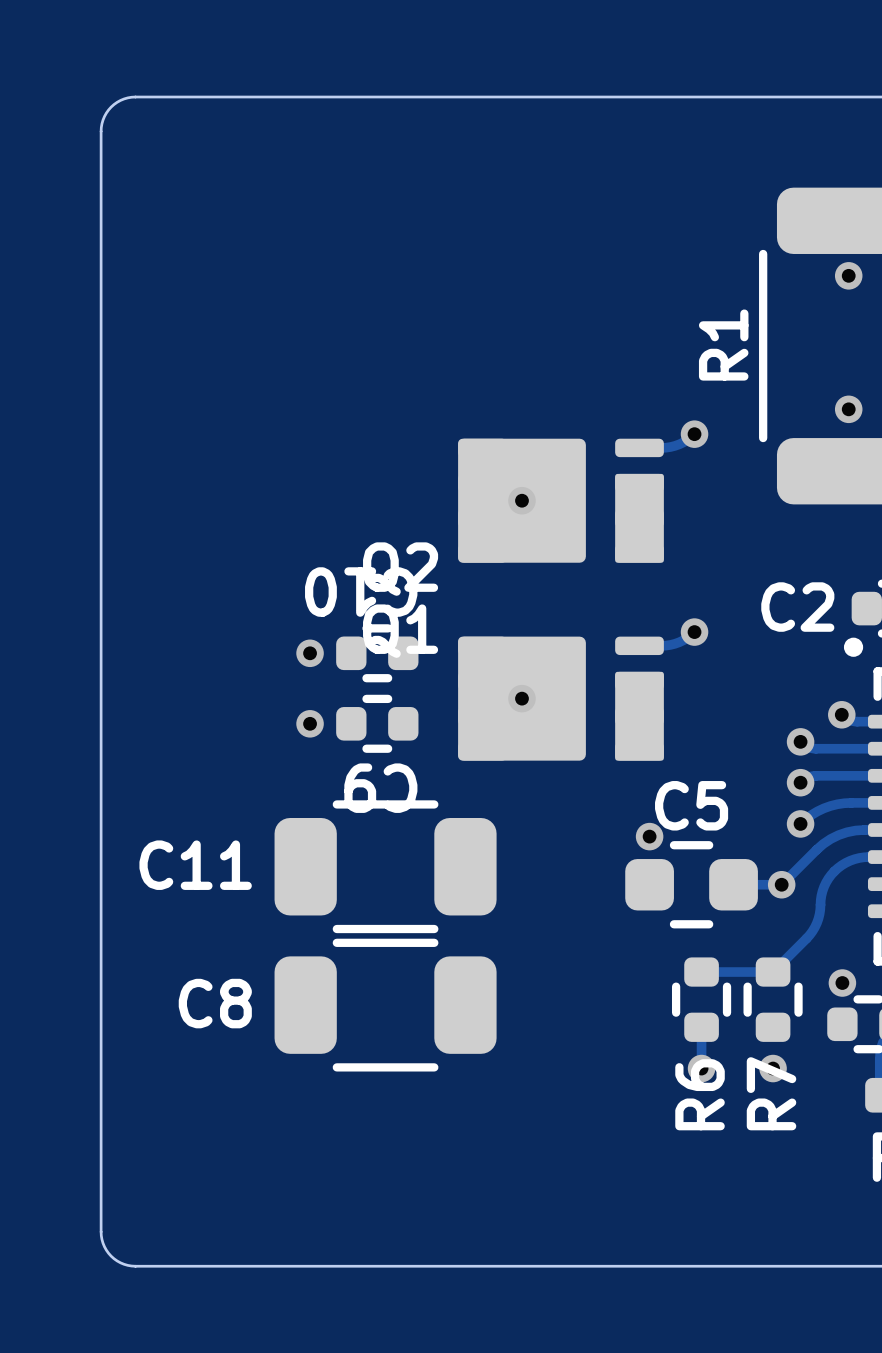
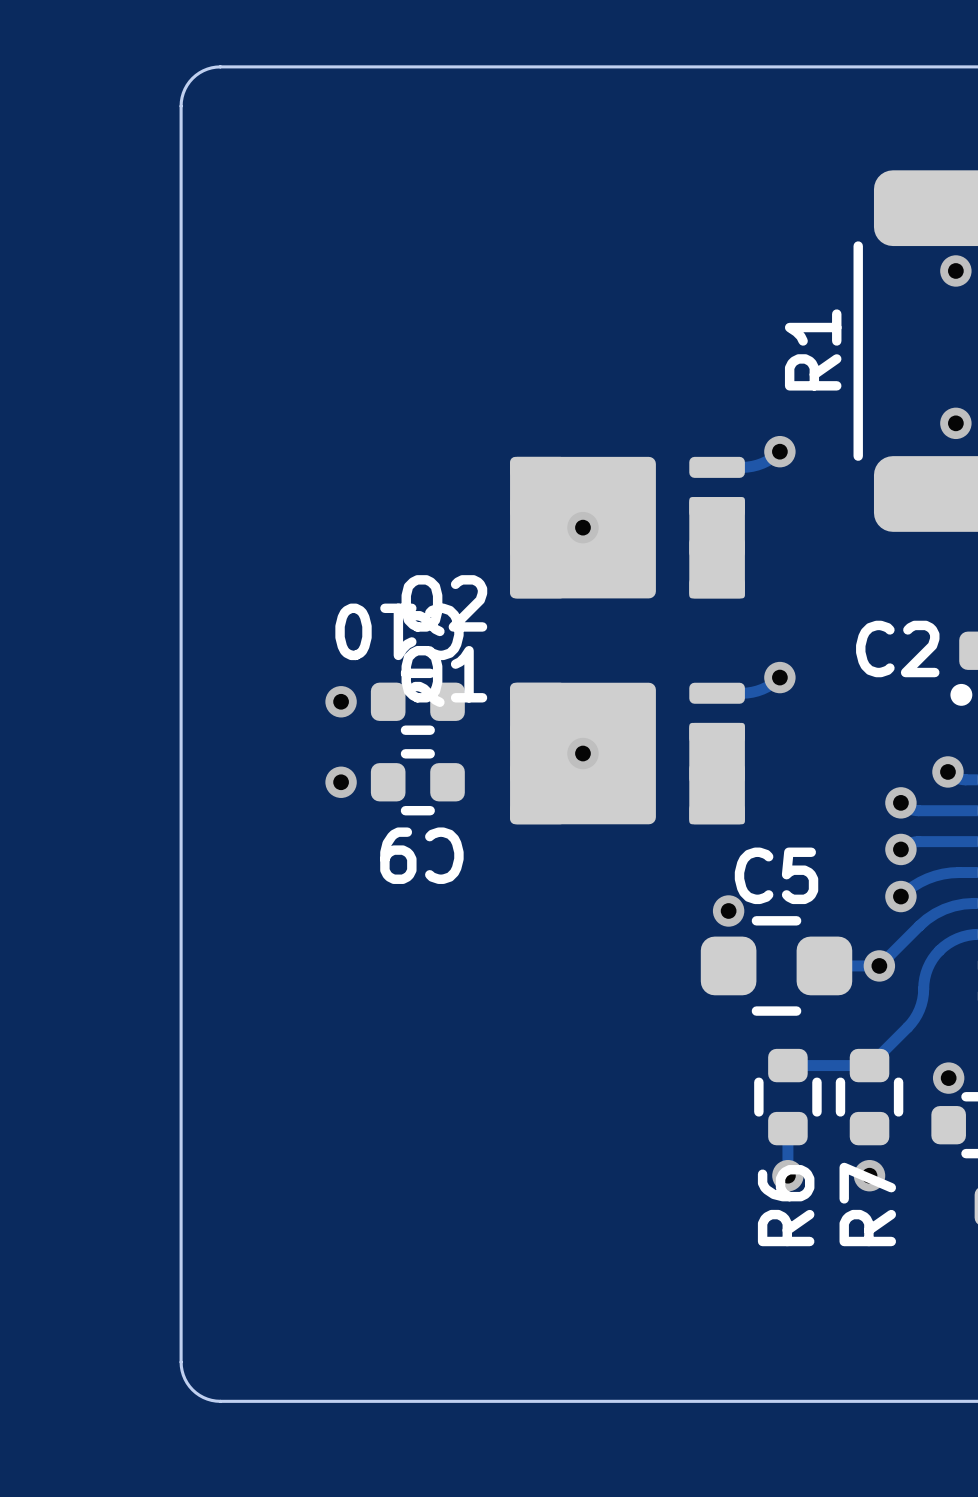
board edge: (204, 97) (135, 97) (124, 98) (114, 104) (106, 113) (101, 131) (101, 1235) (108, 1253) (124, 1264) (135, 1266) (204, 1266) -> (220, 66) (203, 70) (192, 78) (183, 93) (181, 106) (181, 1362) (183, 1375) (192, 1389) (207, 1399) (220, 1401)
C11: (385, 866) -> none
C8: (385, 1005) -> none

